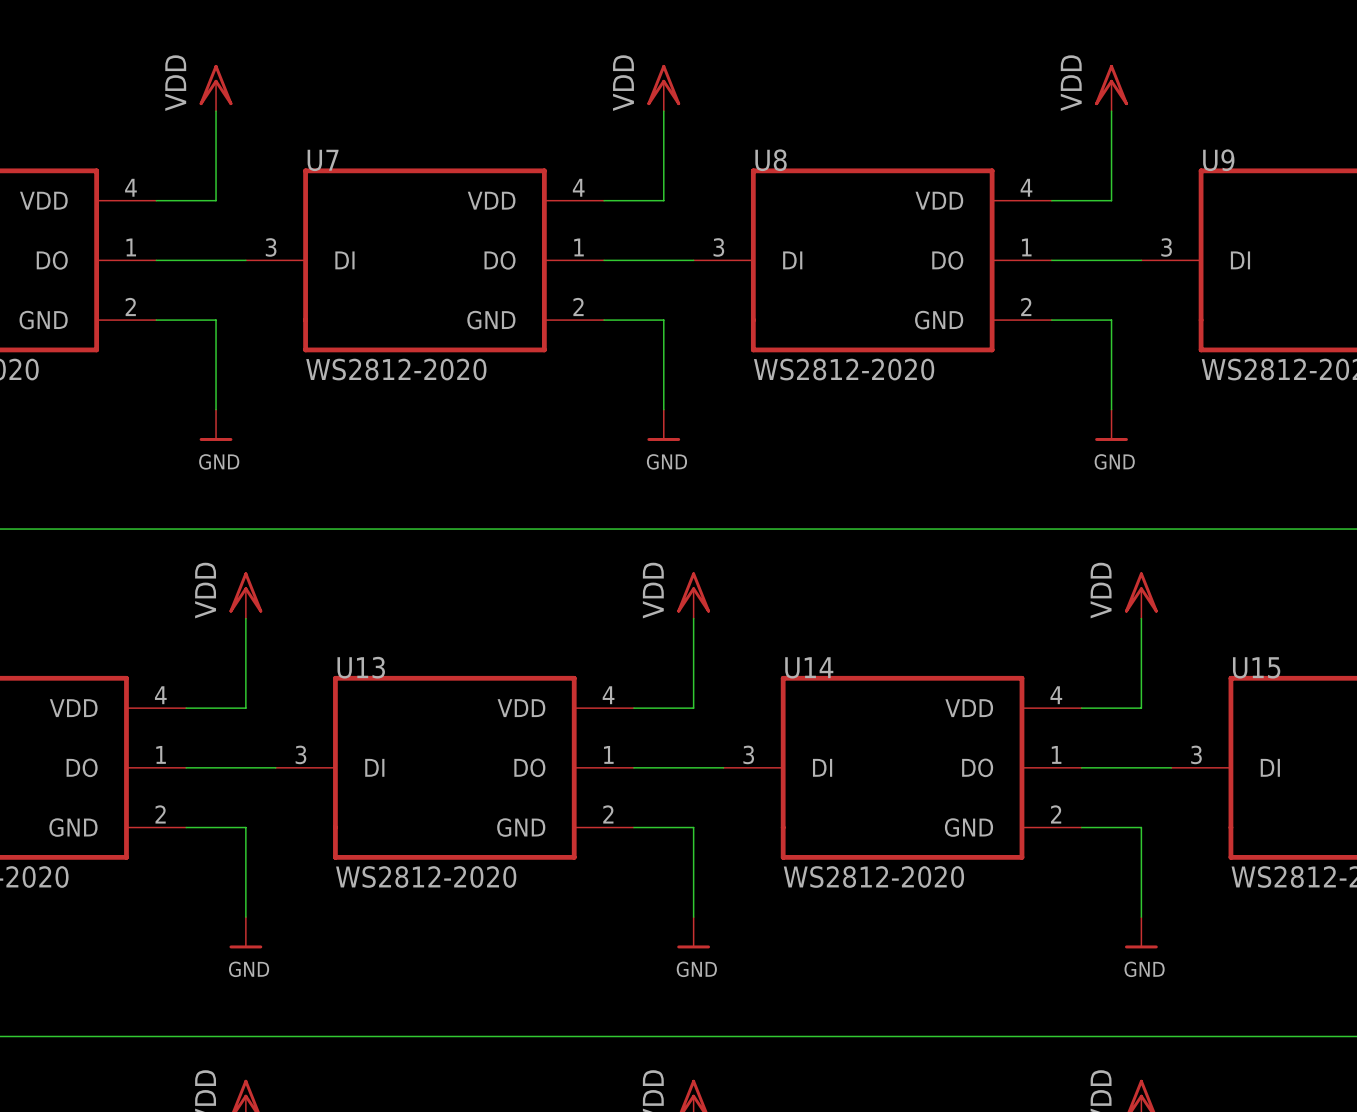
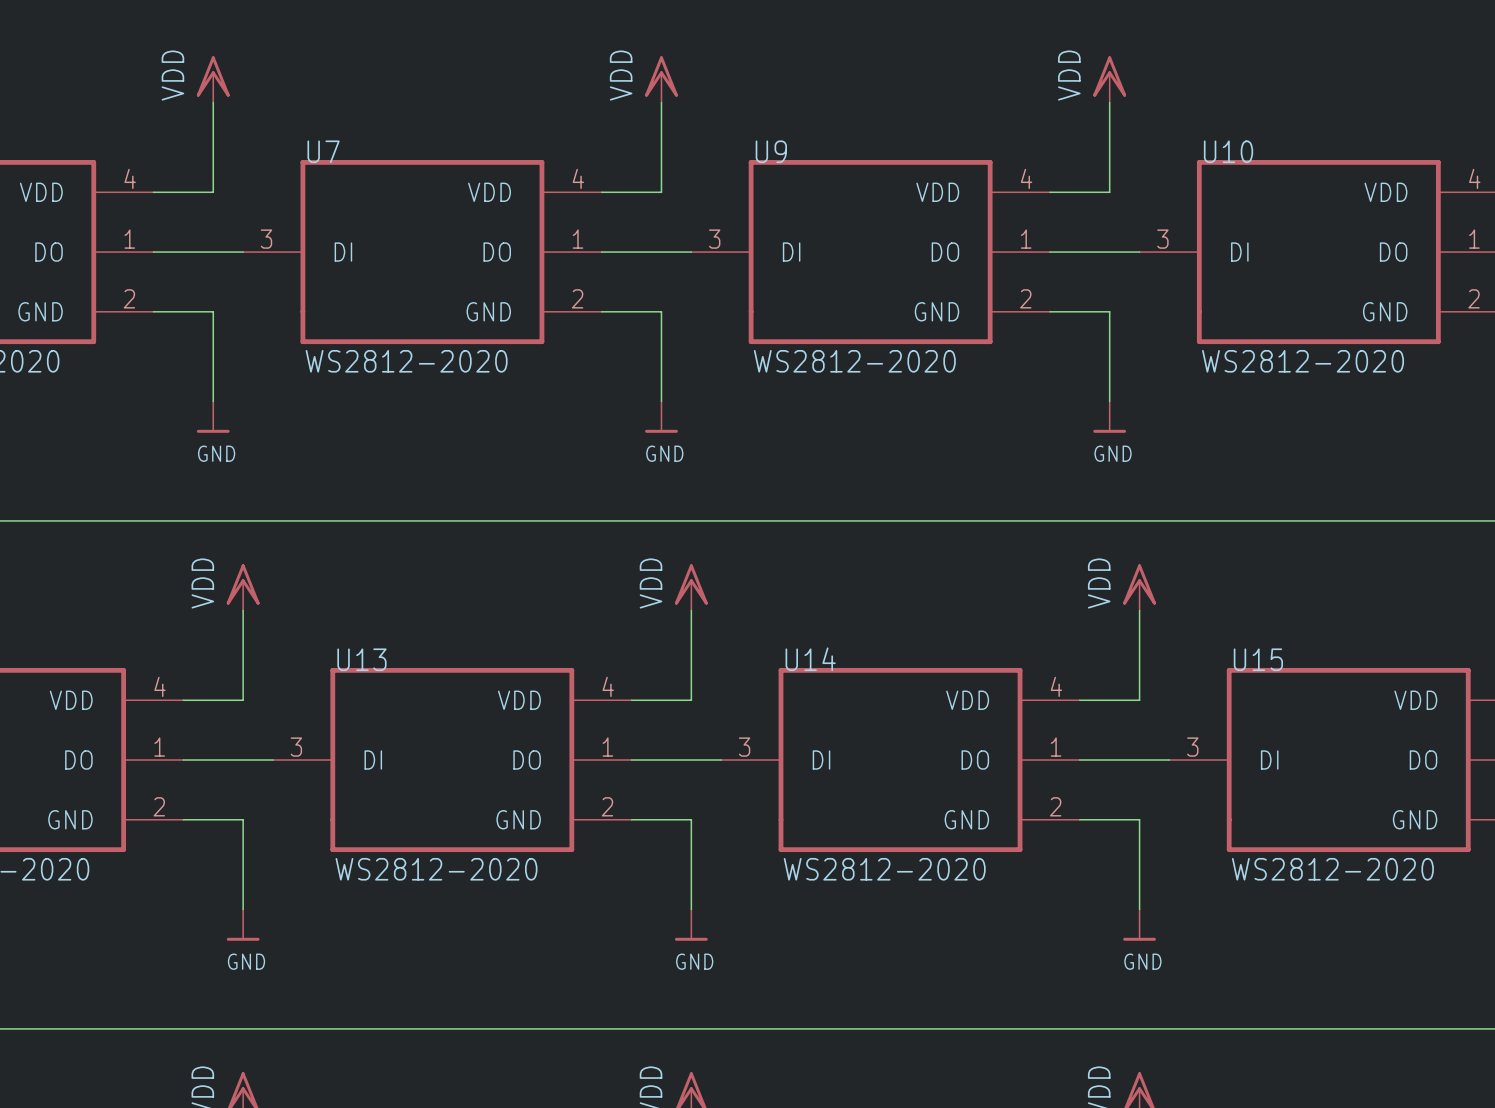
U8 name: U8 (771, 160) -> U9 (771, 151)
U9 name: U9 (1218, 160) -> U10 (1228, 151)

